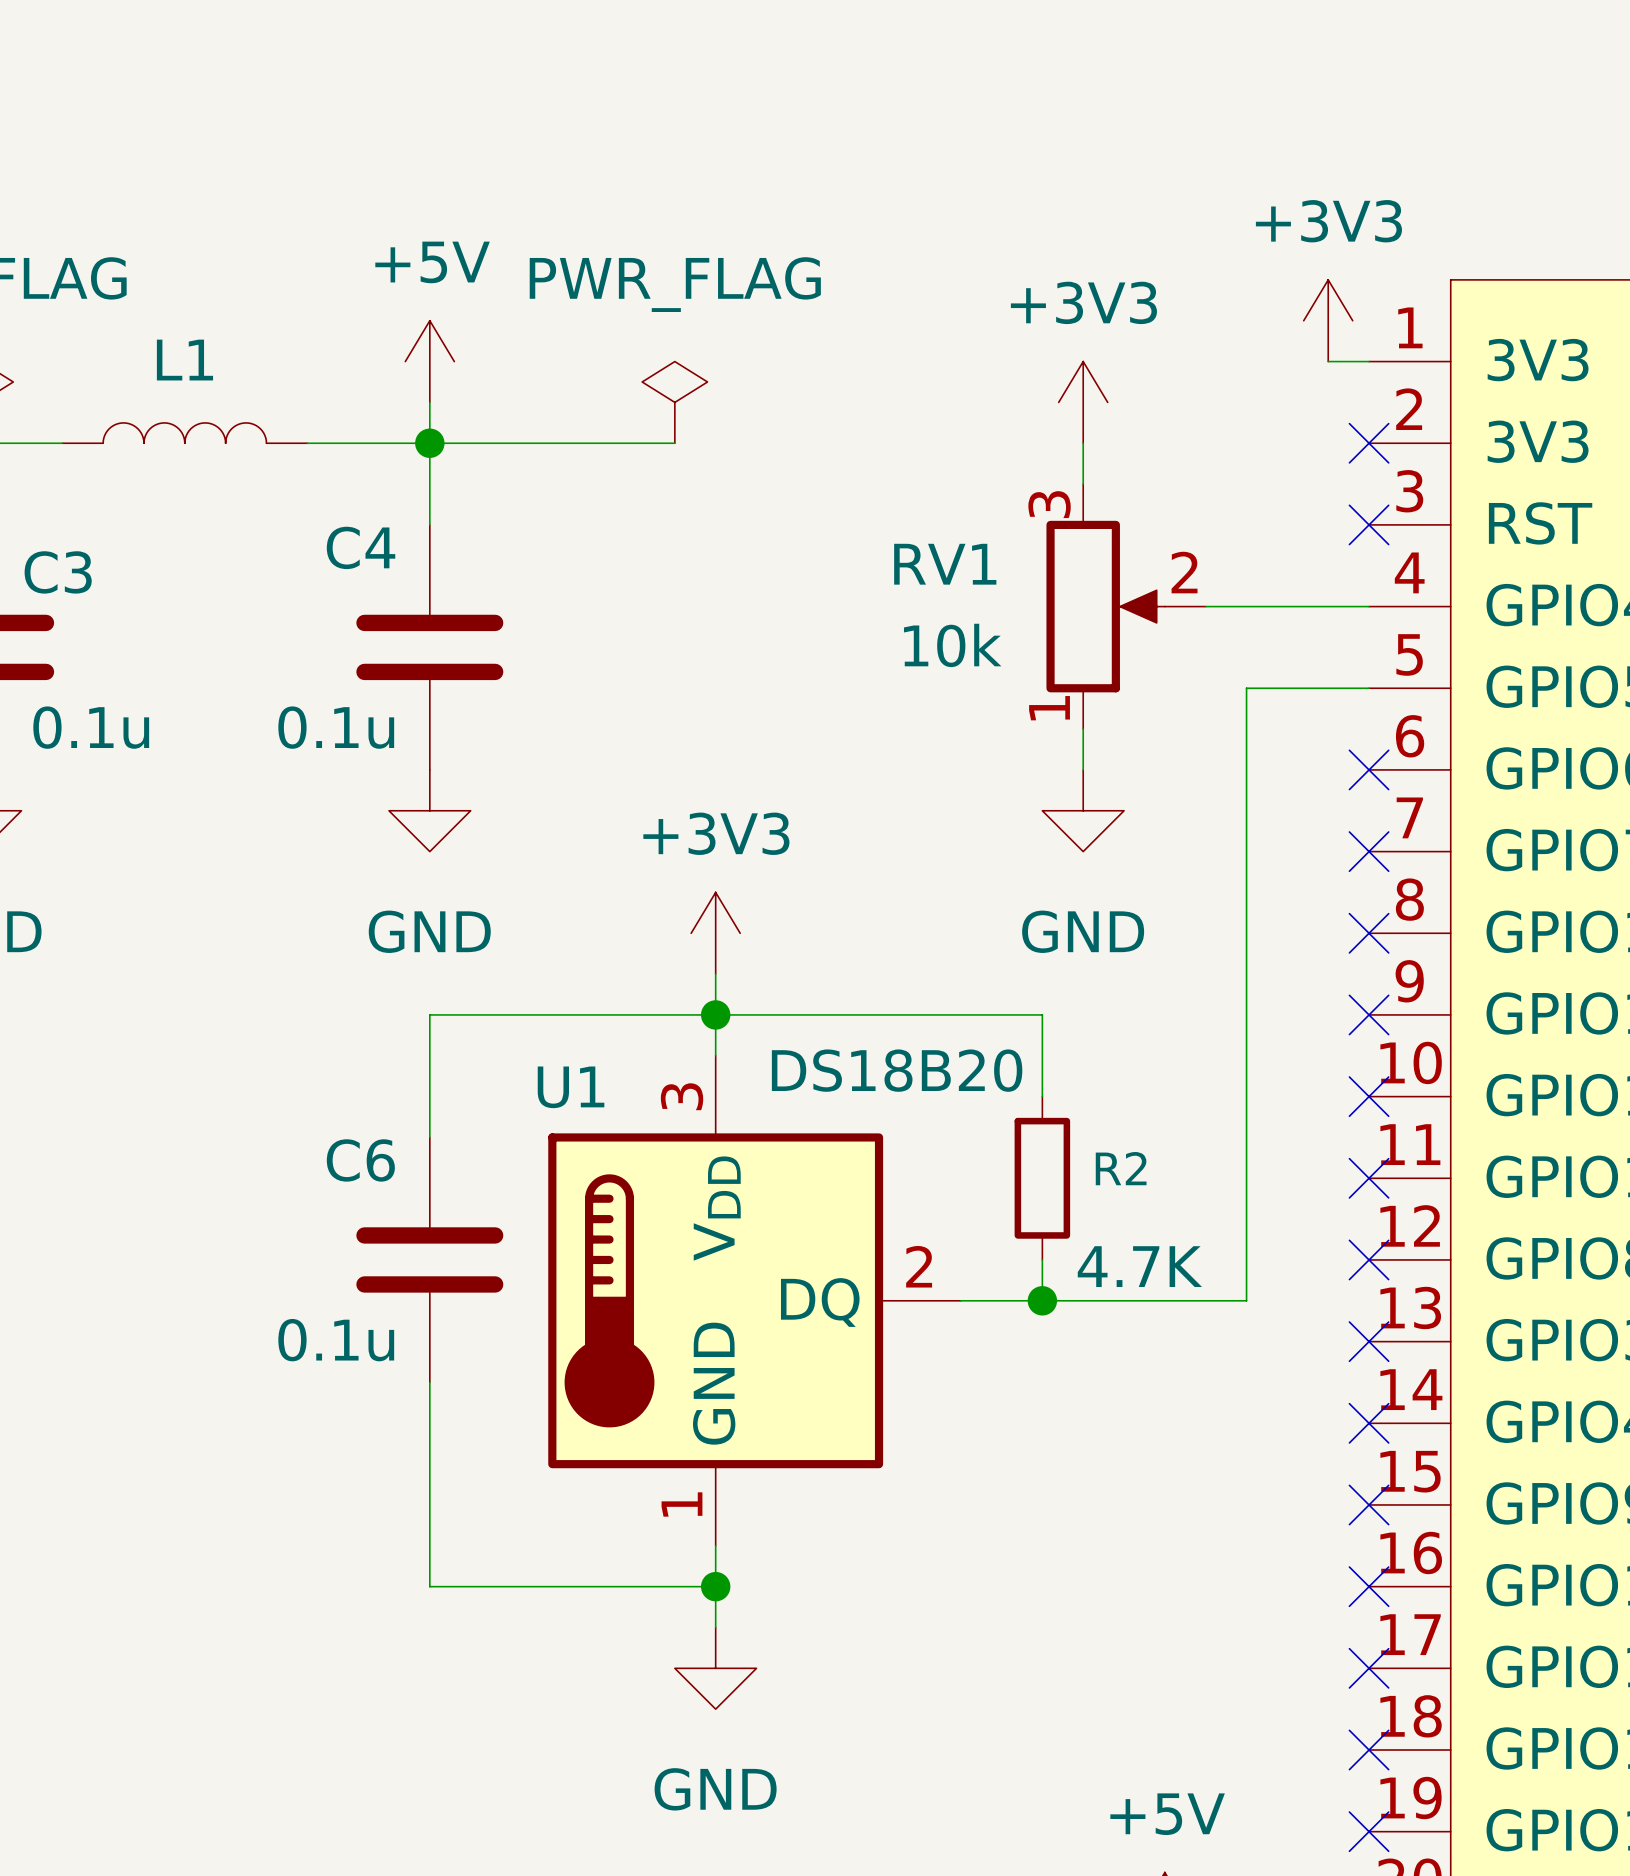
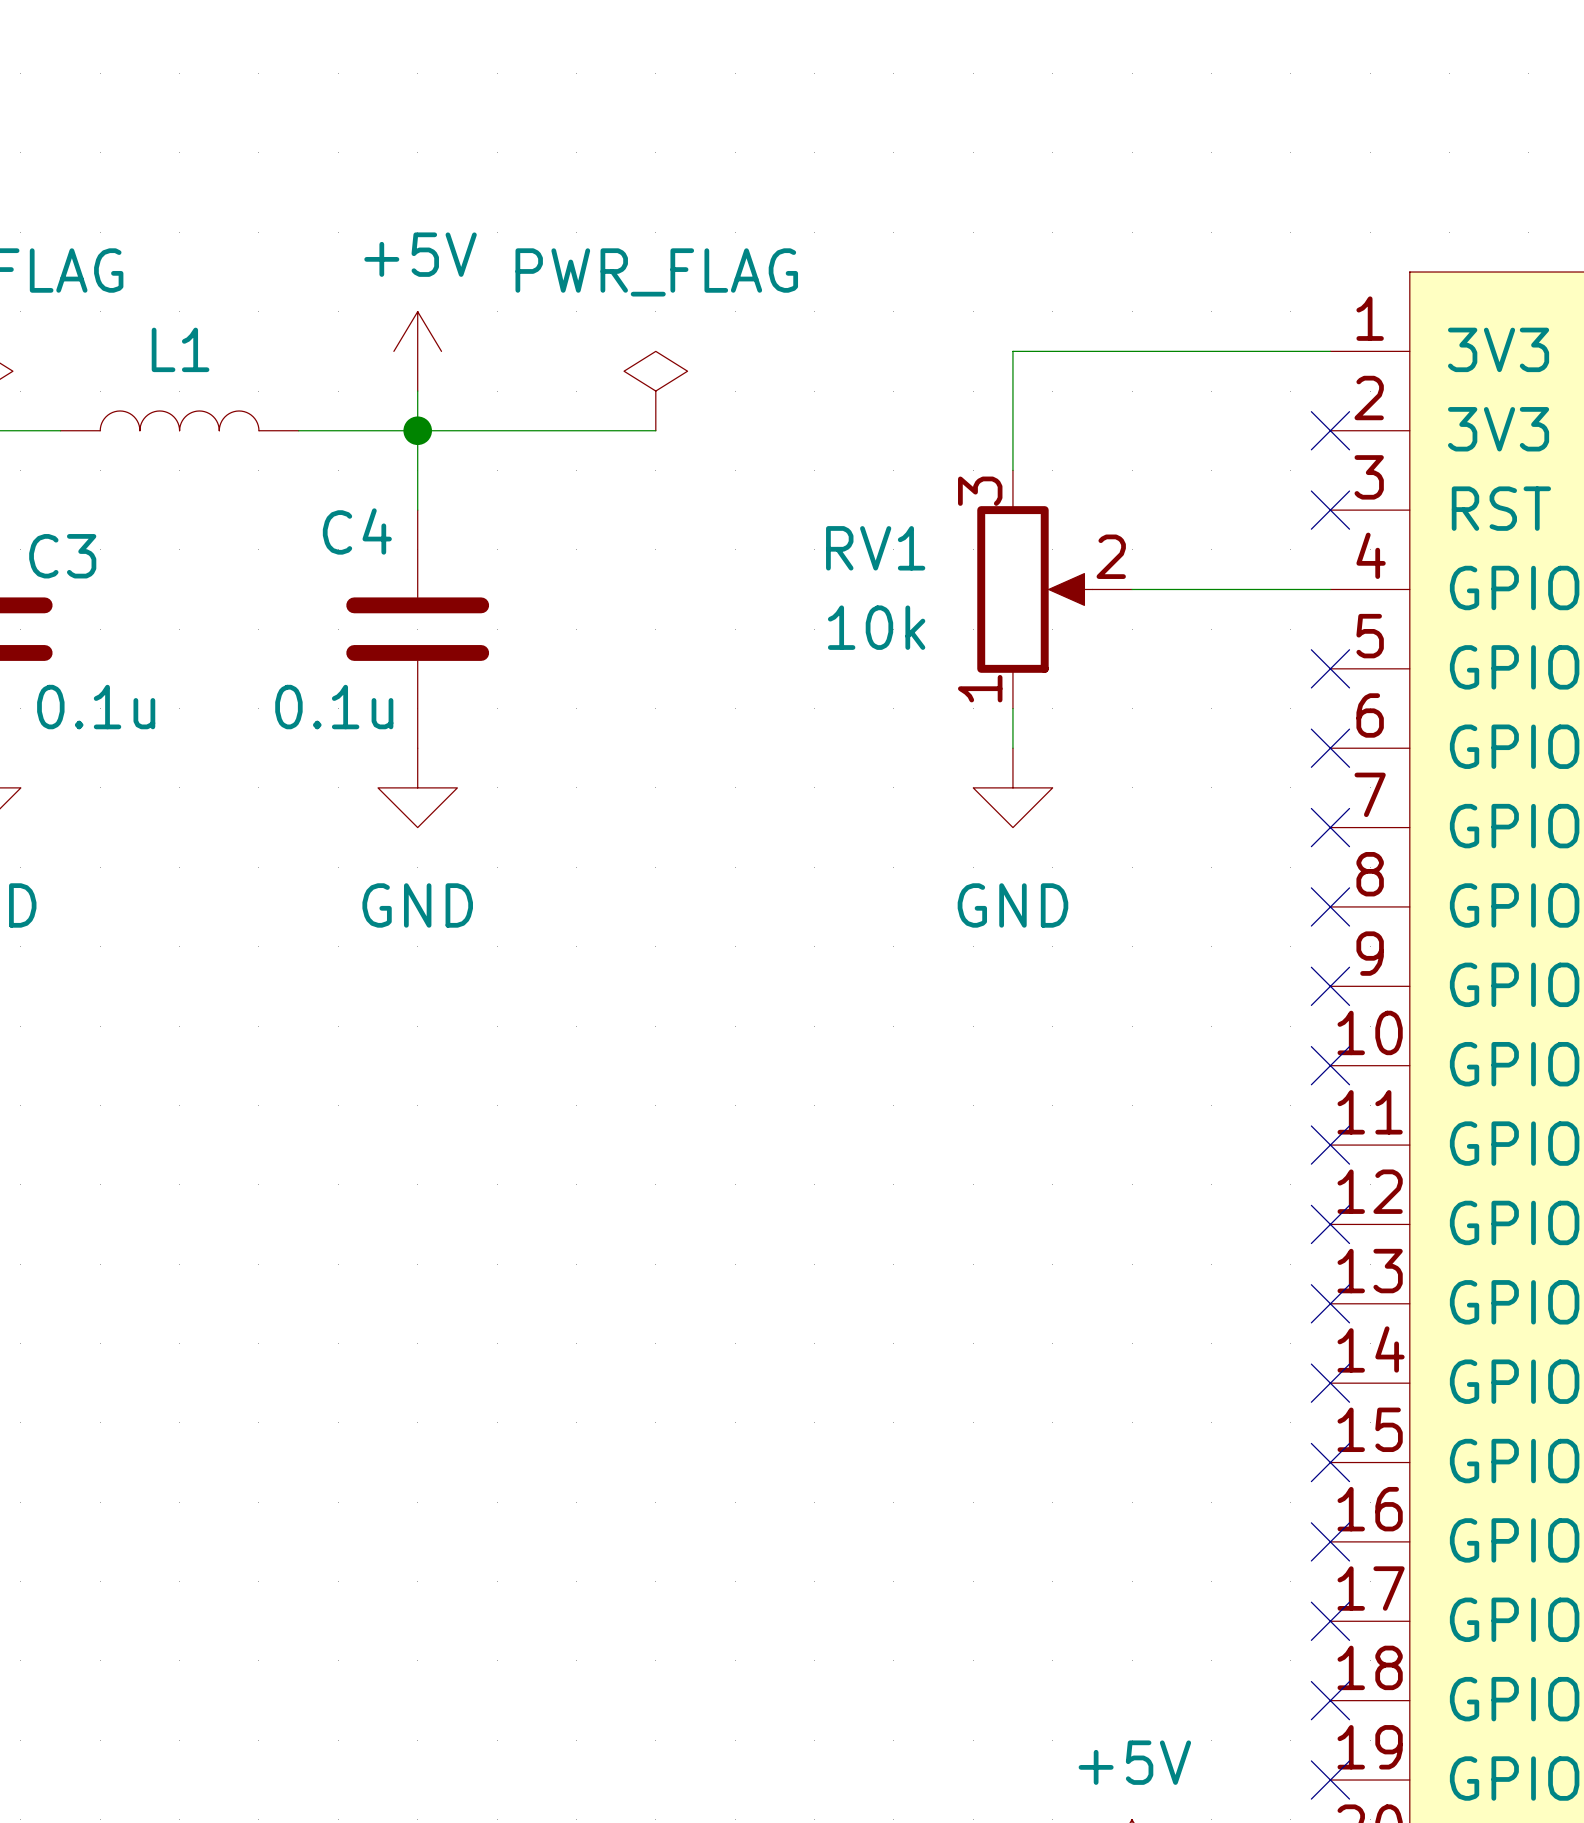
power symbol: +3V3 (1328, 320) -> none
wire: none -> (1290, 351) (1012, 351) (1012, 470)
power symbol: +3V3 (1083, 402) -> none
wire: (1083, 443) (1083, 484) -> none
RV1 position: (1126, 606) -> (1054, 589)
wire: (1369, 688) (1246, 688) (1246, 1300) (960, 1300) -> none
no-connect mark: none -> (1330, 668)
wire: (1083, 729) (1083, 769) -> (1012, 708) (1012, 748)
power symbol position: GND (1083, 810) -> GND (1012, 787)
power symbol: +3V3 (715, 933) -> none
wire: (715, 974) (715, 1055) -> none
junction: (715, 1014) -> none
wire: (1042, 1096) (1042, 1014) (429, 1014) (429, 1137) -> none
R2: 4.7K (1042, 1178) -> none
C6: 0.1u (429, 1259) -> none
wire: (1042, 1259) (1042, 1300) -> none
U1: DS18B20 (754, 1300) -> none
junction: (1042, 1300) -> none
wire: (429, 1382) (429, 1586) (715, 1586) -> none
wire: (715, 1545) (715, 1627) -> none
junction: (715, 1586) -> none
power symbol: GND (715, 1668) -> none

